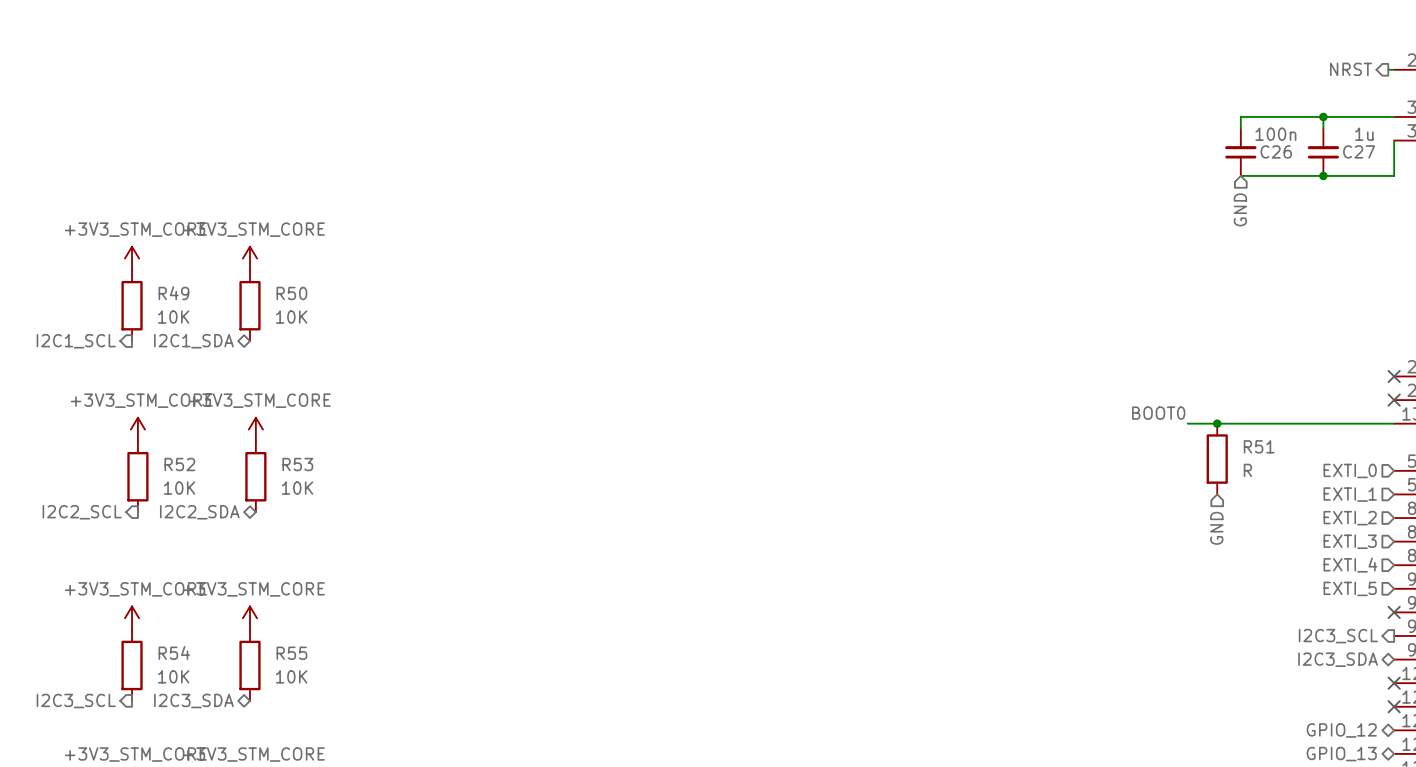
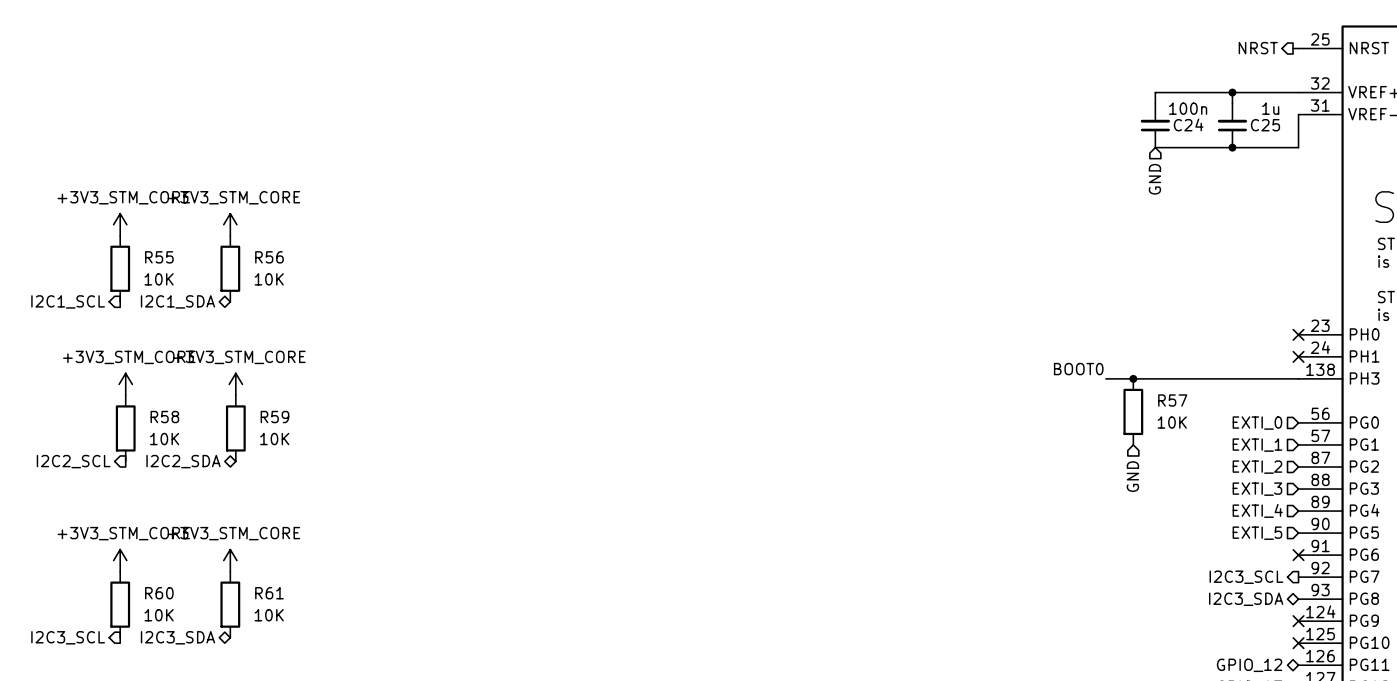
C26 name: C26 (1276, 151) -> C24 (1188, 124)
C27 name: C27 (1359, 151) -> C25 (1265, 125)
R49 name: R49 (173, 293) -> R55 (159, 257)
R50 name: R50 (291, 293) -> R56 (269, 257)
R51 name: R51 (1259, 446) -> R57 (1172, 400)
R52 name: R52 (179, 464) -> R58 (164, 417)
R53 name: R53 (297, 464) -> R59 (274, 417)
R51 value: R (1247, 470) -> 10K (1172, 422)
R54 name: R54 (174, 652) -> R60 (159, 593)
R55 name: R55 (291, 653) -> R61 (269, 593)

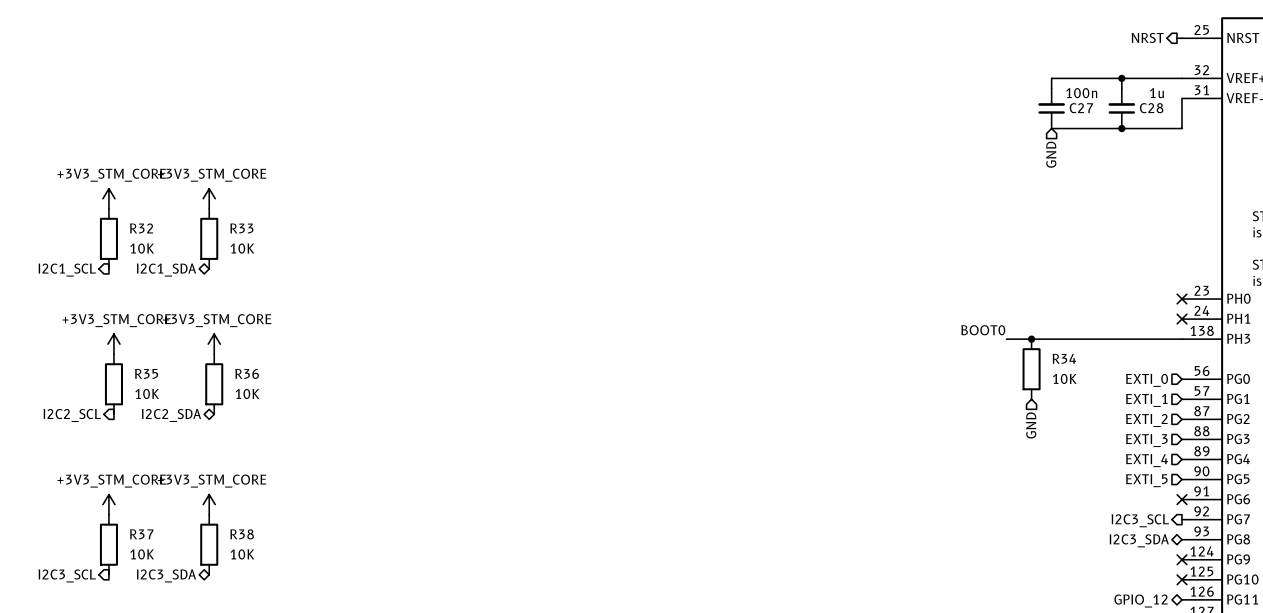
C24 name: C24 (1188, 124) -> C27 (1081, 108)
C25 name: C25 (1265, 125) -> C28 (1151, 108)
R55 name: R55 (159, 257) -> R32 (141, 228)
R56 name: R56 (269, 257) -> R33 (241, 228)
R57 name: R57 (1172, 400) -> R34 (1064, 358)
R58 name: R58 (164, 417) -> R35 (146, 373)
R59 name: R59 (274, 417) -> R36 (247, 373)
R60 name: R60 (159, 593) -> R37 (141, 534)
R61 name: R61 (269, 593) -> R38 (242, 534)

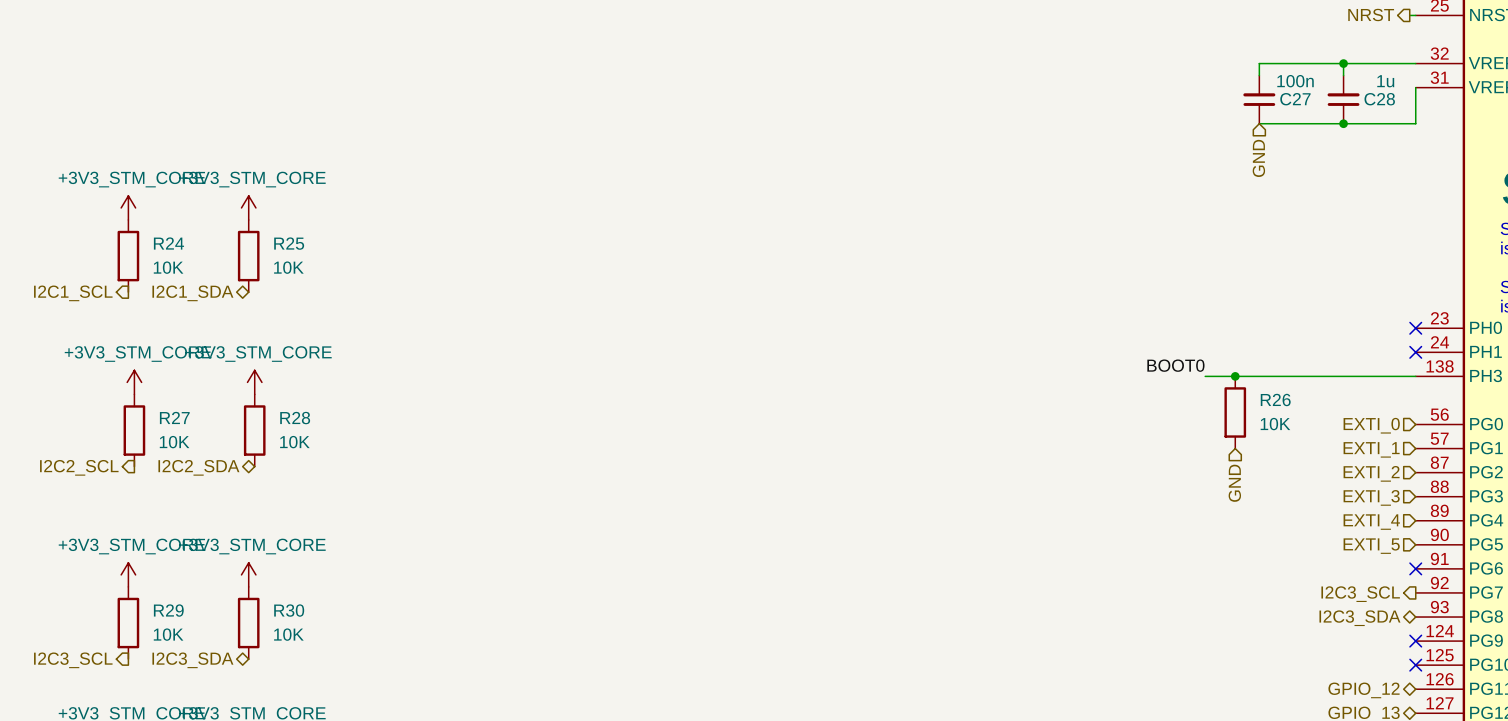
R32 name: R32 (141, 228) -> R24 (168, 243)
R33 name: R33 (241, 228) -> R25 (289, 243)
R34 name: R34 (1064, 358) -> R26 (1275, 399)
R35 name: R35 (146, 373) -> R27 (174, 417)
R36 name: R36 (247, 373) -> R28 (295, 418)
R37 name: R37 (141, 534) -> R29 (168, 610)
R38 name: R38 (242, 534) -> R30 (289, 610)

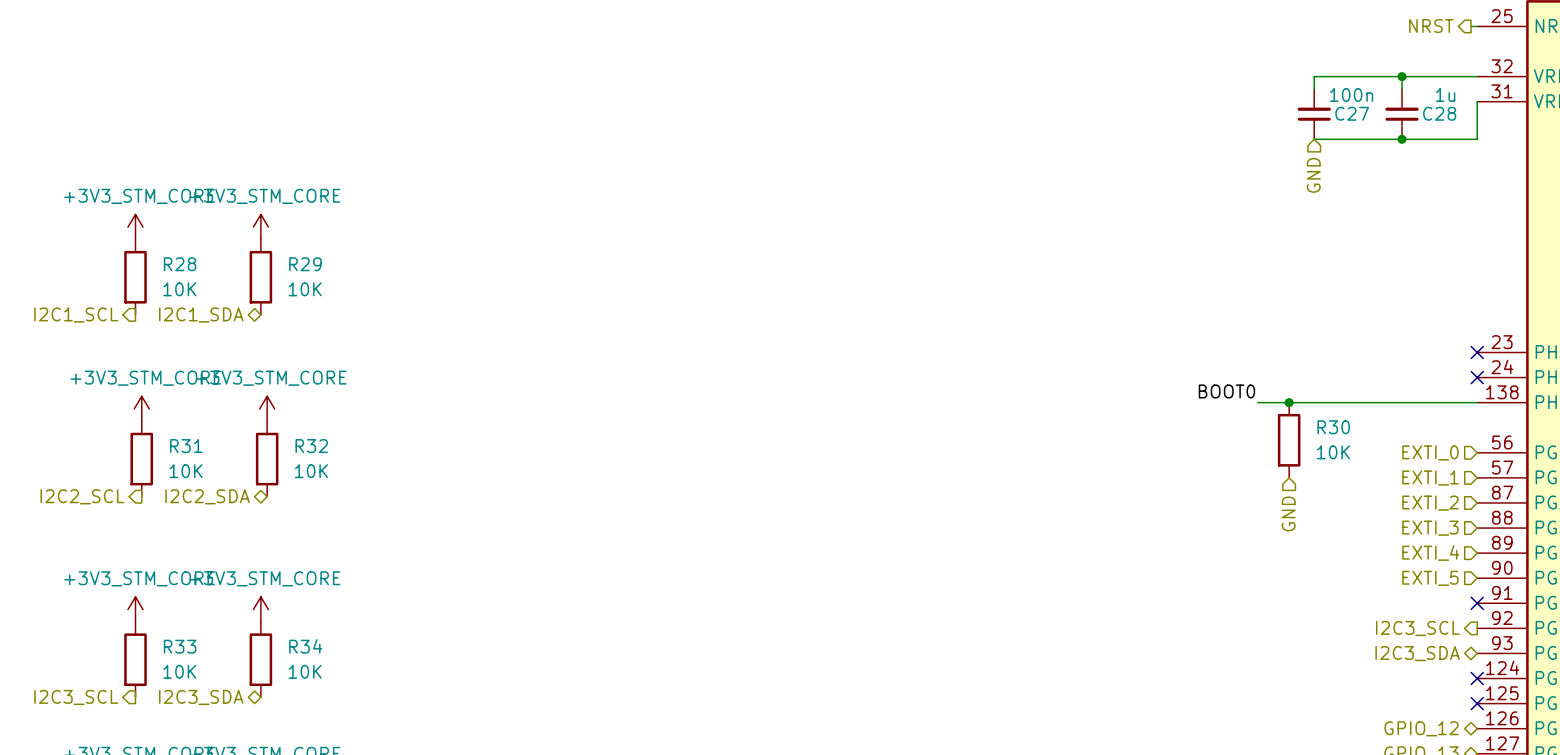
R24 name: R24 (168, 243) -> R28 (180, 264)
R25 name: R25 (289, 243) -> R29 (305, 264)
R26 name: R26 (1275, 399) -> R30 (1333, 427)
R27 name: R27 (174, 417) -> R31 (186, 446)
R28 name: R28 (295, 418) -> R32 (311, 446)
R29 name: R29 (168, 610) -> R33 (180, 646)
R30 name: R30 (289, 610) -> R34 (305, 646)

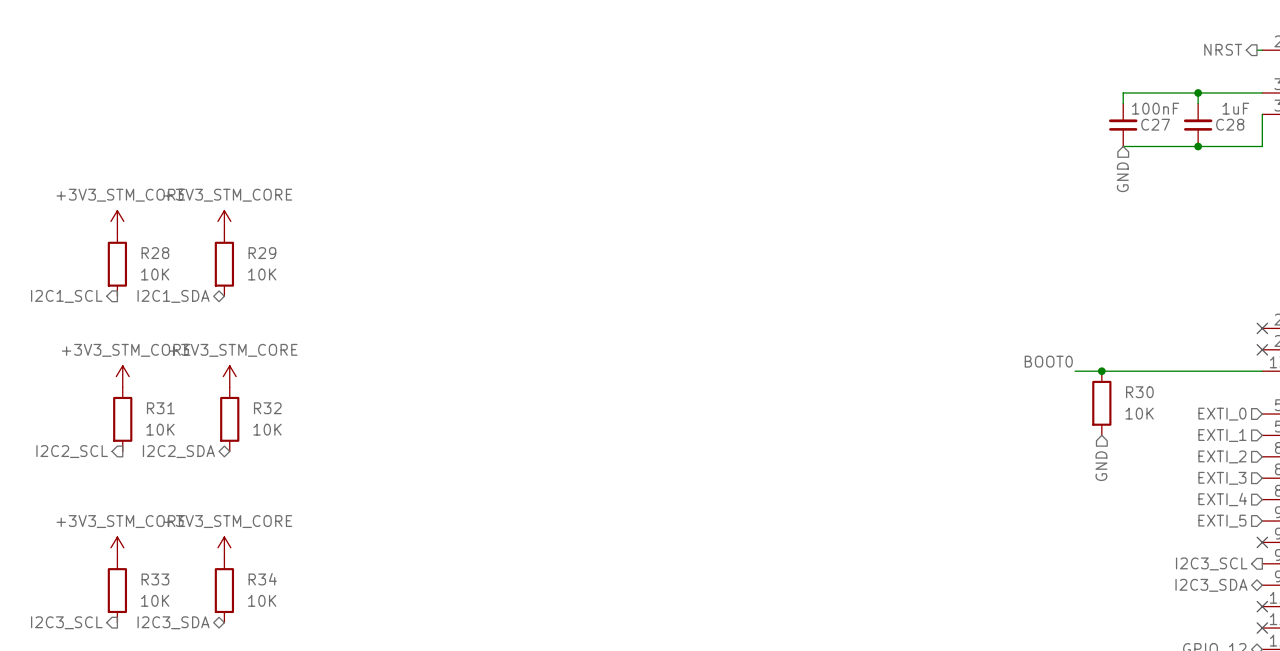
C27 value: 100n (1351, 94) -> 100nF (1155, 108)
C28 value: 1u (1445, 94) -> 1uF (1235, 108)

